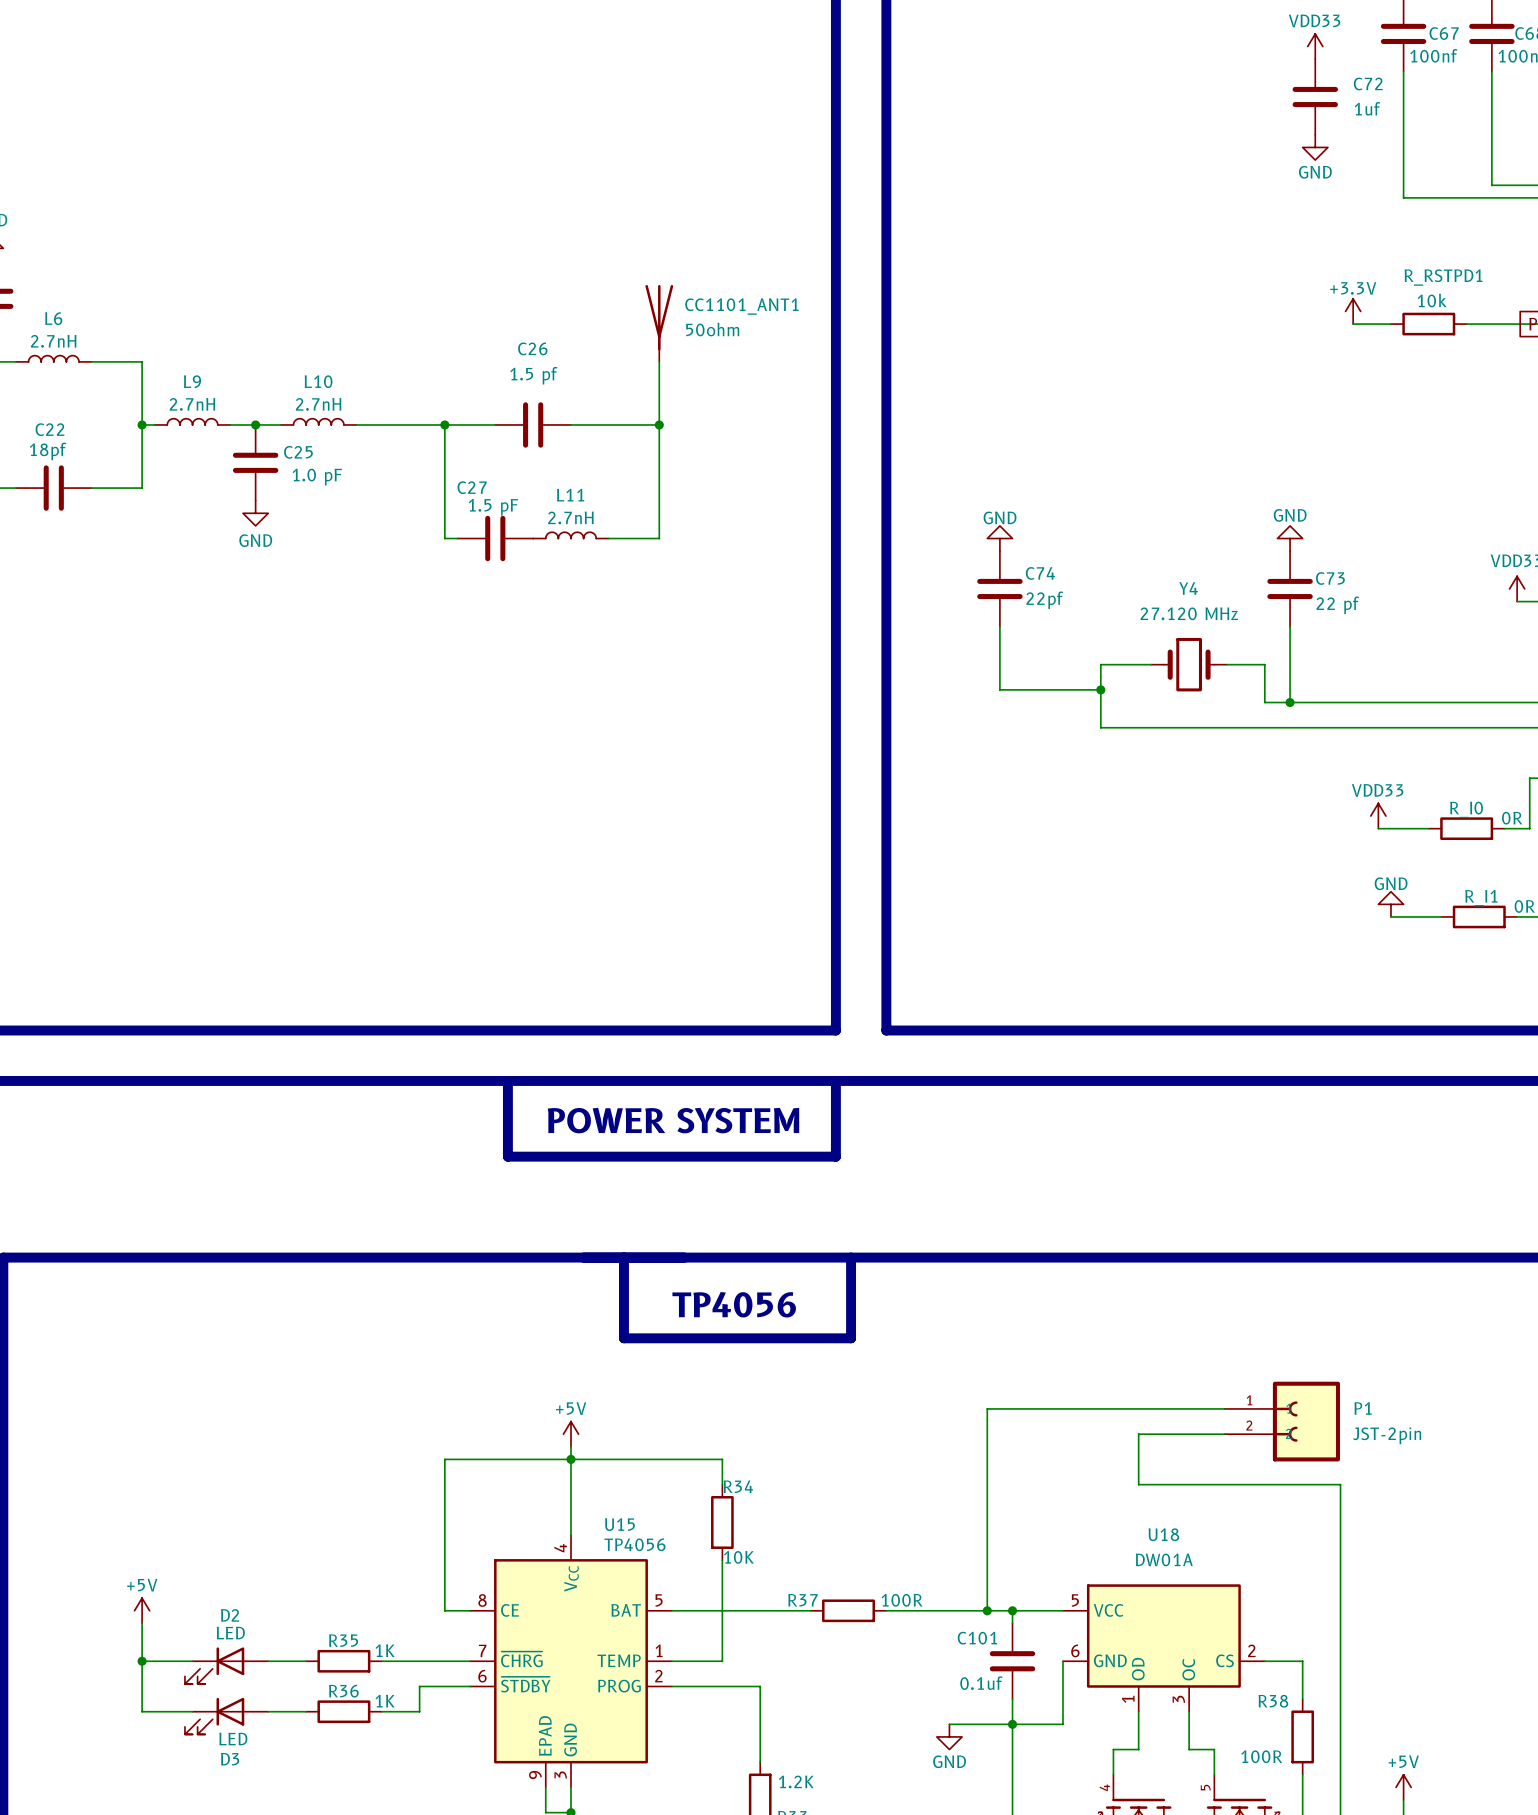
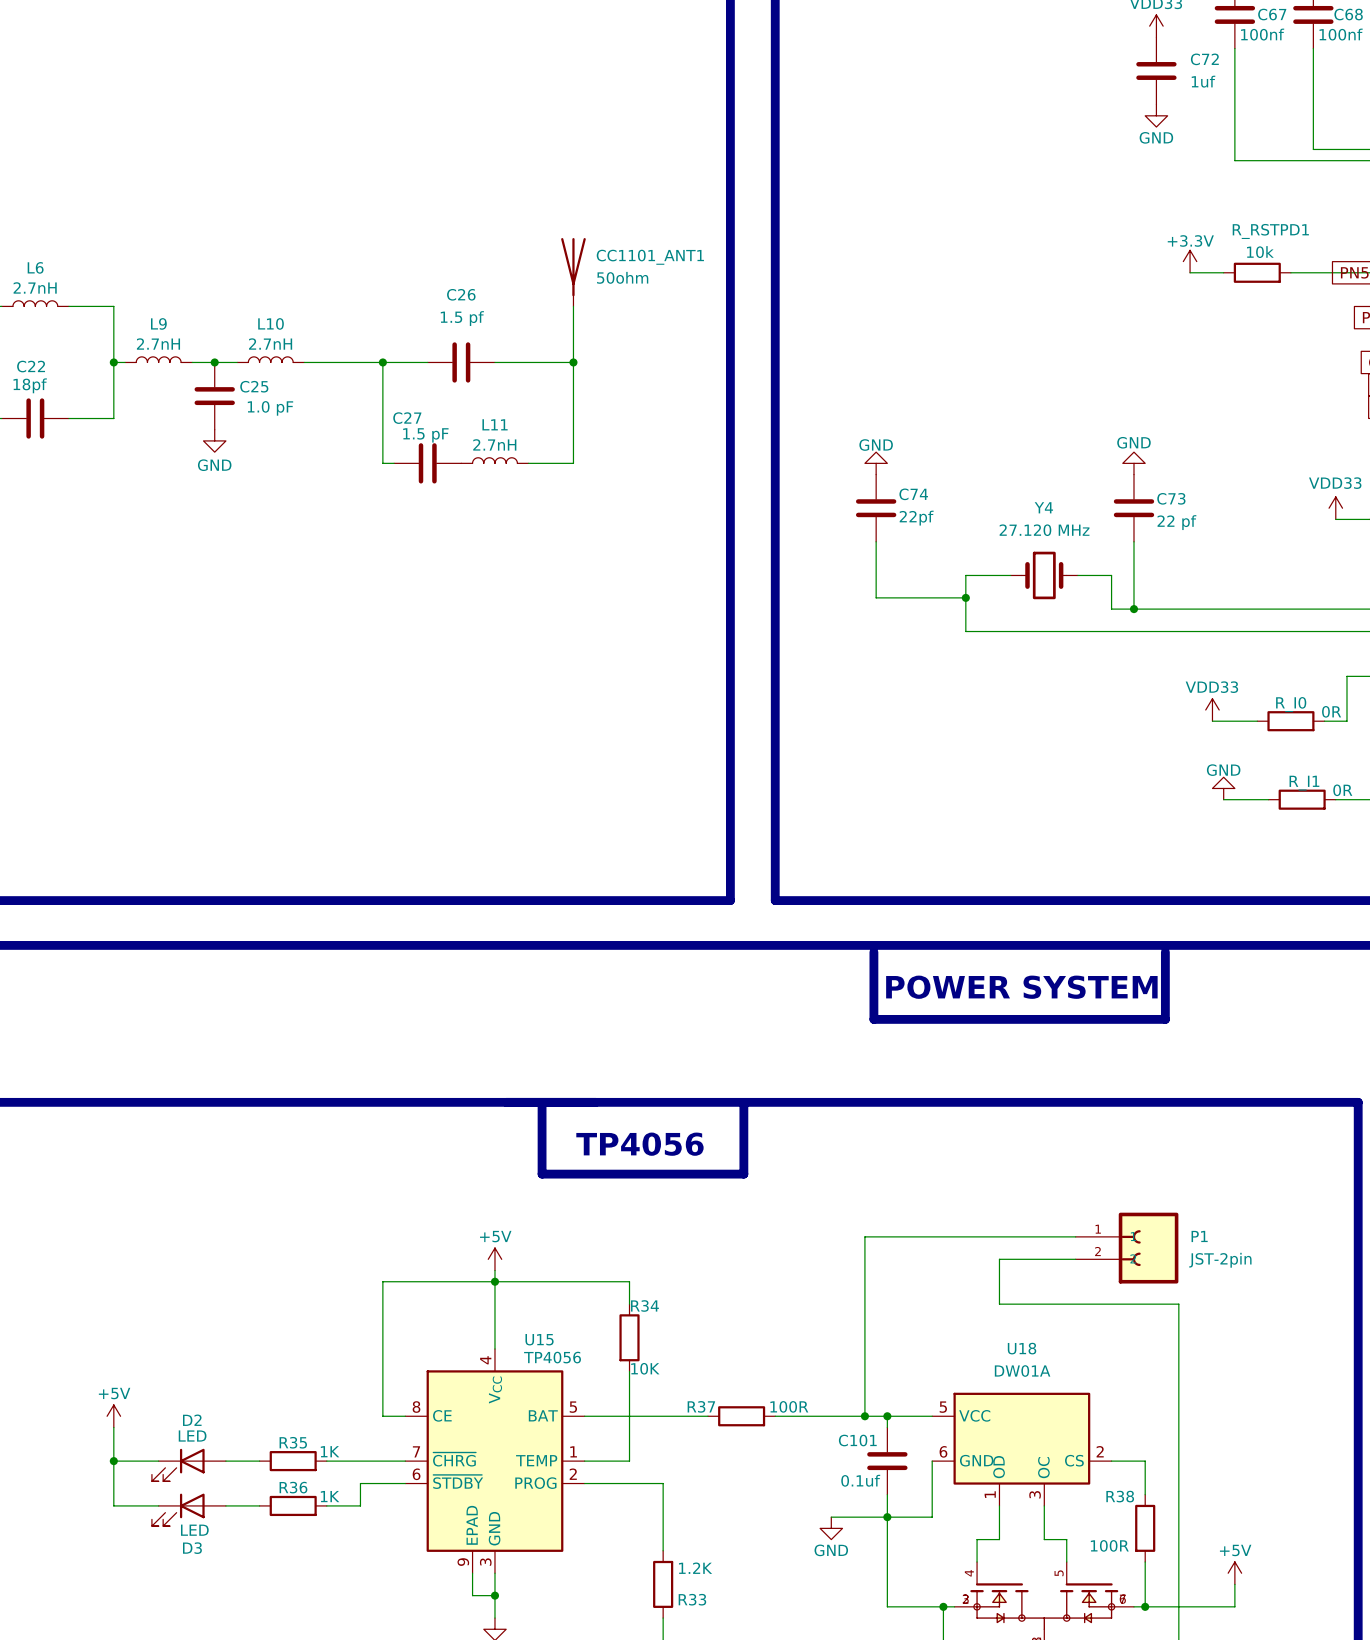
line: (507, 1080) (507, 1156) (835, 1156) (835, 1080) -> none
line: none -> (873, 952) (873, 1019) (1165, 1019) (1165, 952)
text: POWER SYSTEM (673, 1120) -> none
text: none -> POWER SYSTEM (1021, 987)

